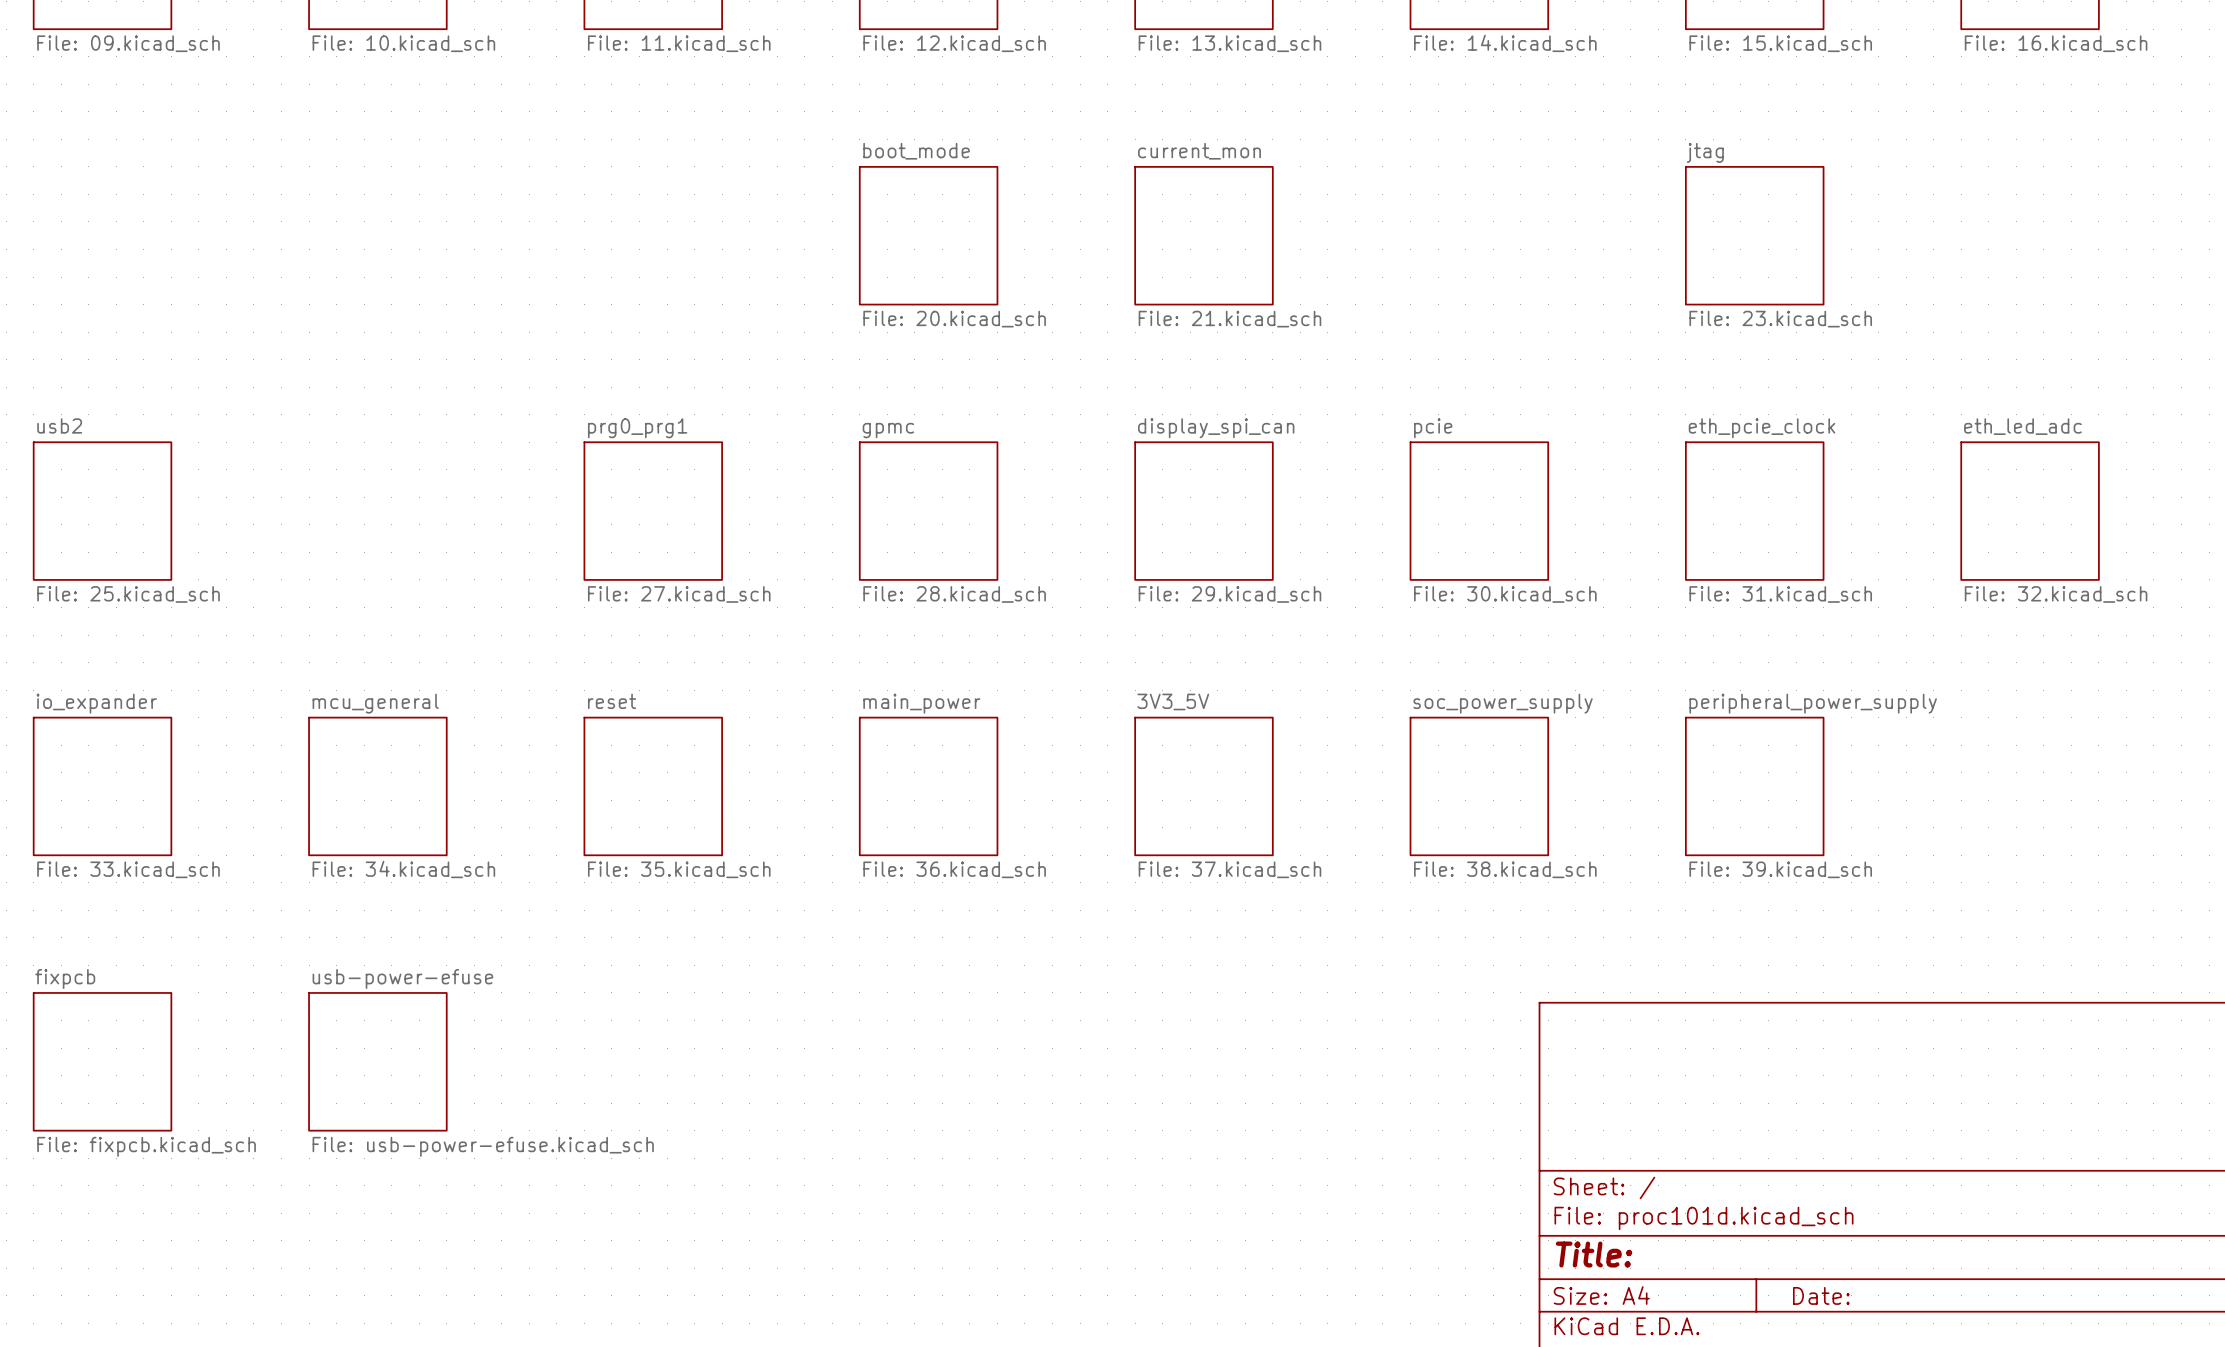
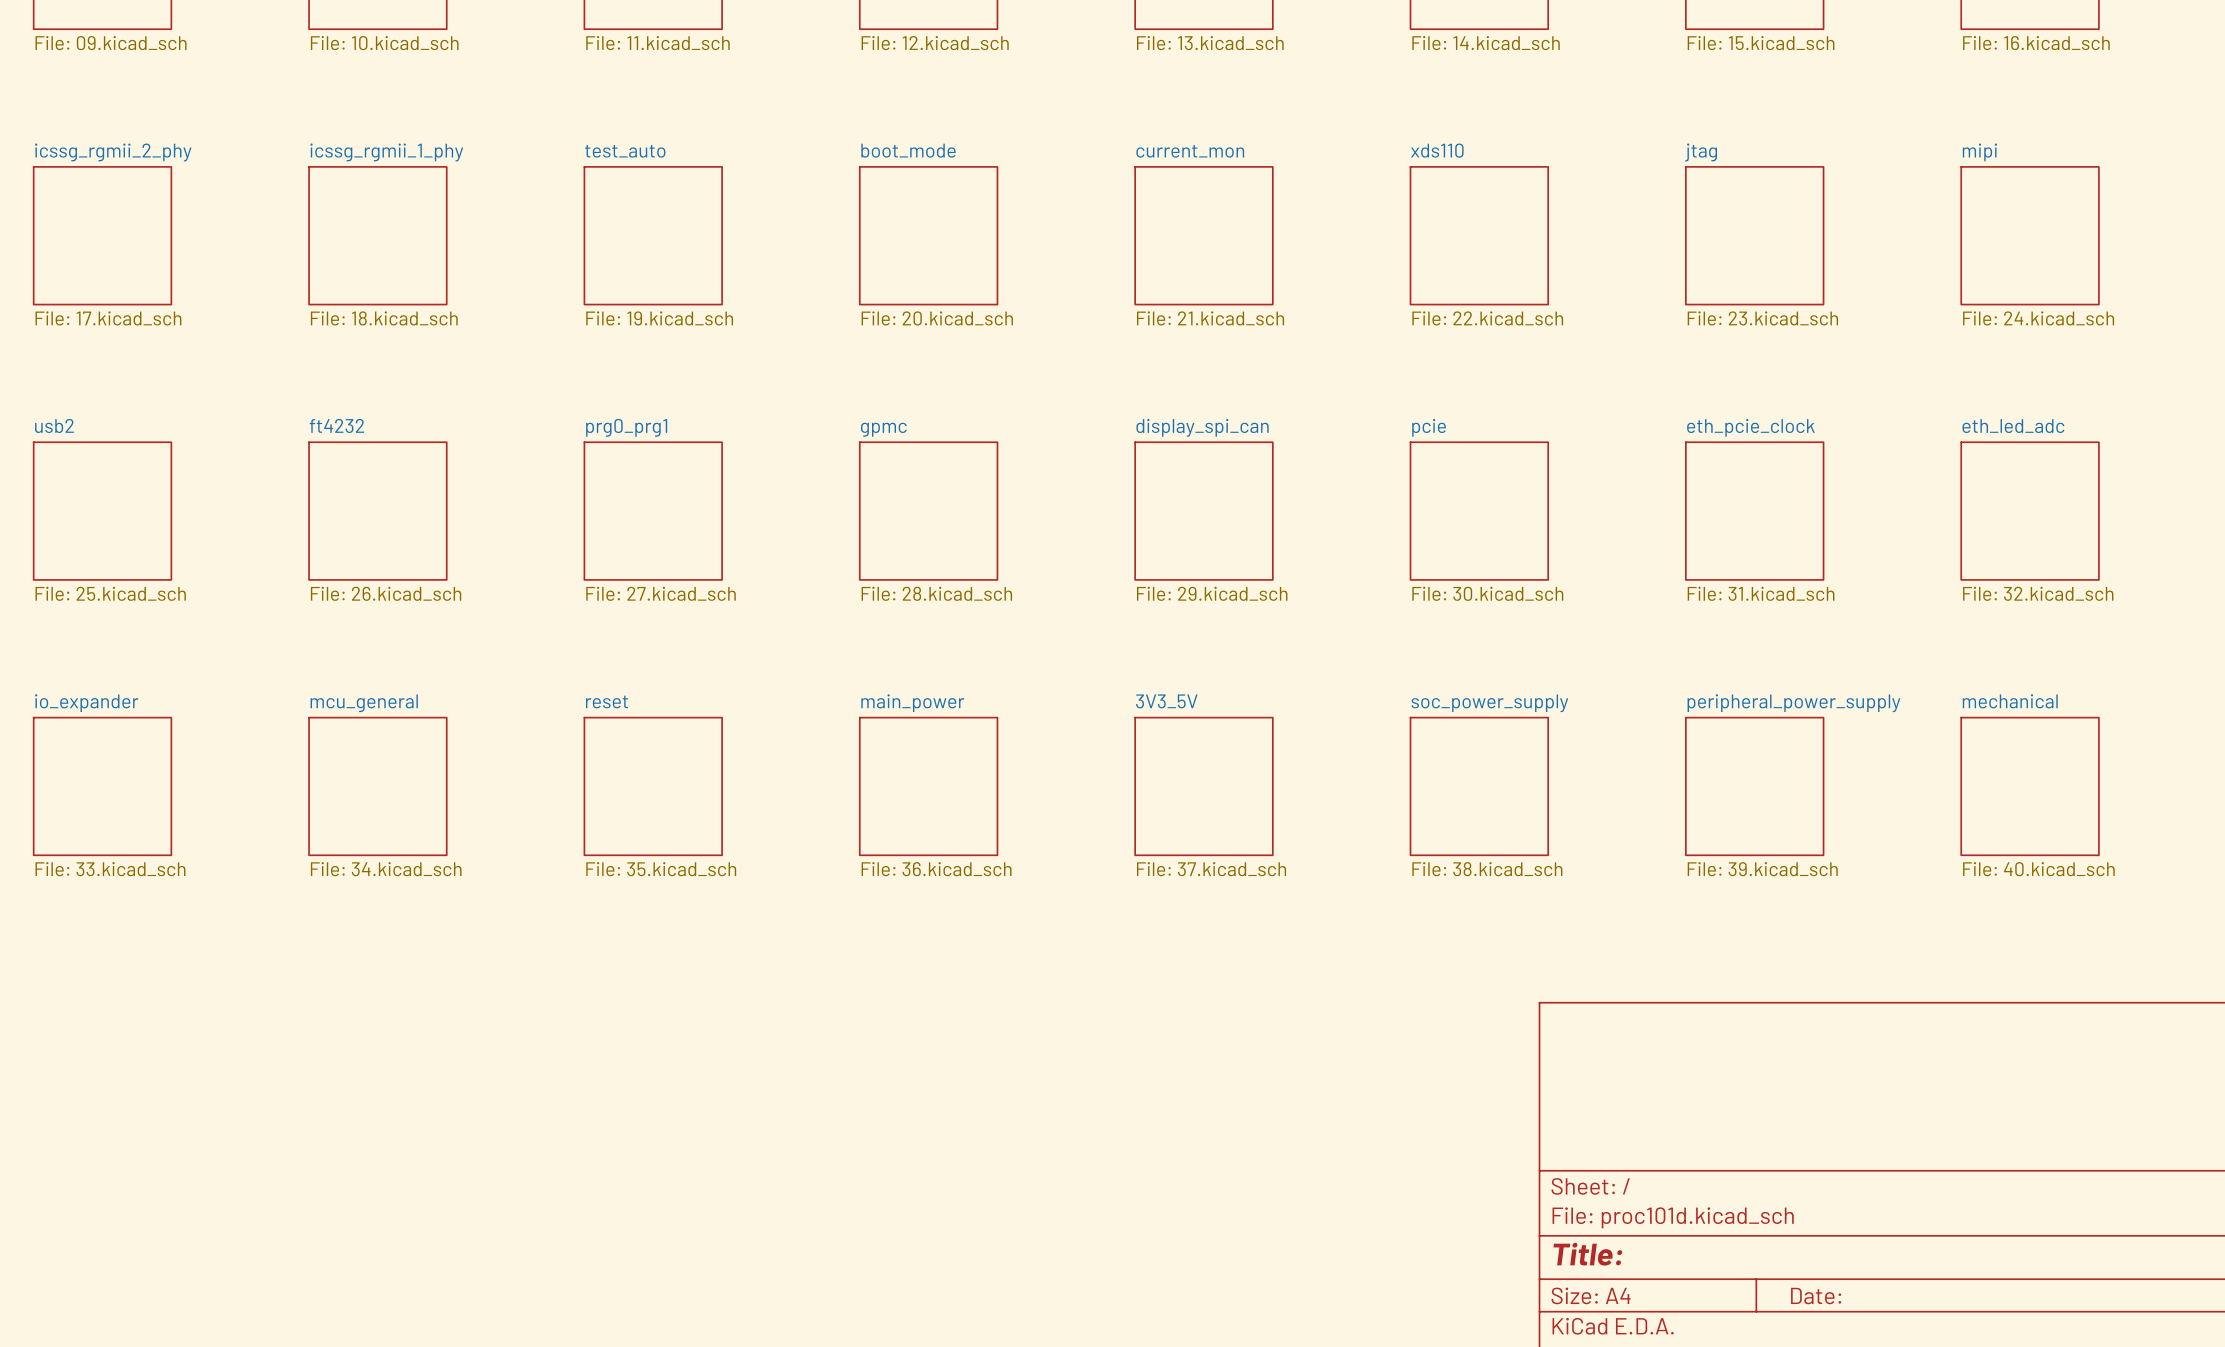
sheet icssg_rgmii_2_phy: none -> File: 17.kicad_sch (102, 235)
sheet icssg_rgmii_1_phy: none -> File: 18.kicad_sch (377, 235)
sheet test_auto: none -> File: 19.kicad_sch (653, 235)
sheet xds110: none -> File: 22.kicad_sch (1479, 235)
sheet mipi: none -> File: 24.kicad_sch (2030, 235)
sheet ft4232: none -> File: 26.kicad_sch (377, 511)
sheet mechanical: none -> File: 40.kicad_sch (2030, 786)
sheet fixpcb: File: fixpcb.kicad_sch (102, 1061) -> none
sheet usb-power-efuse: File: usb-power-efuse.kicad_sch (377, 1061) -> none

